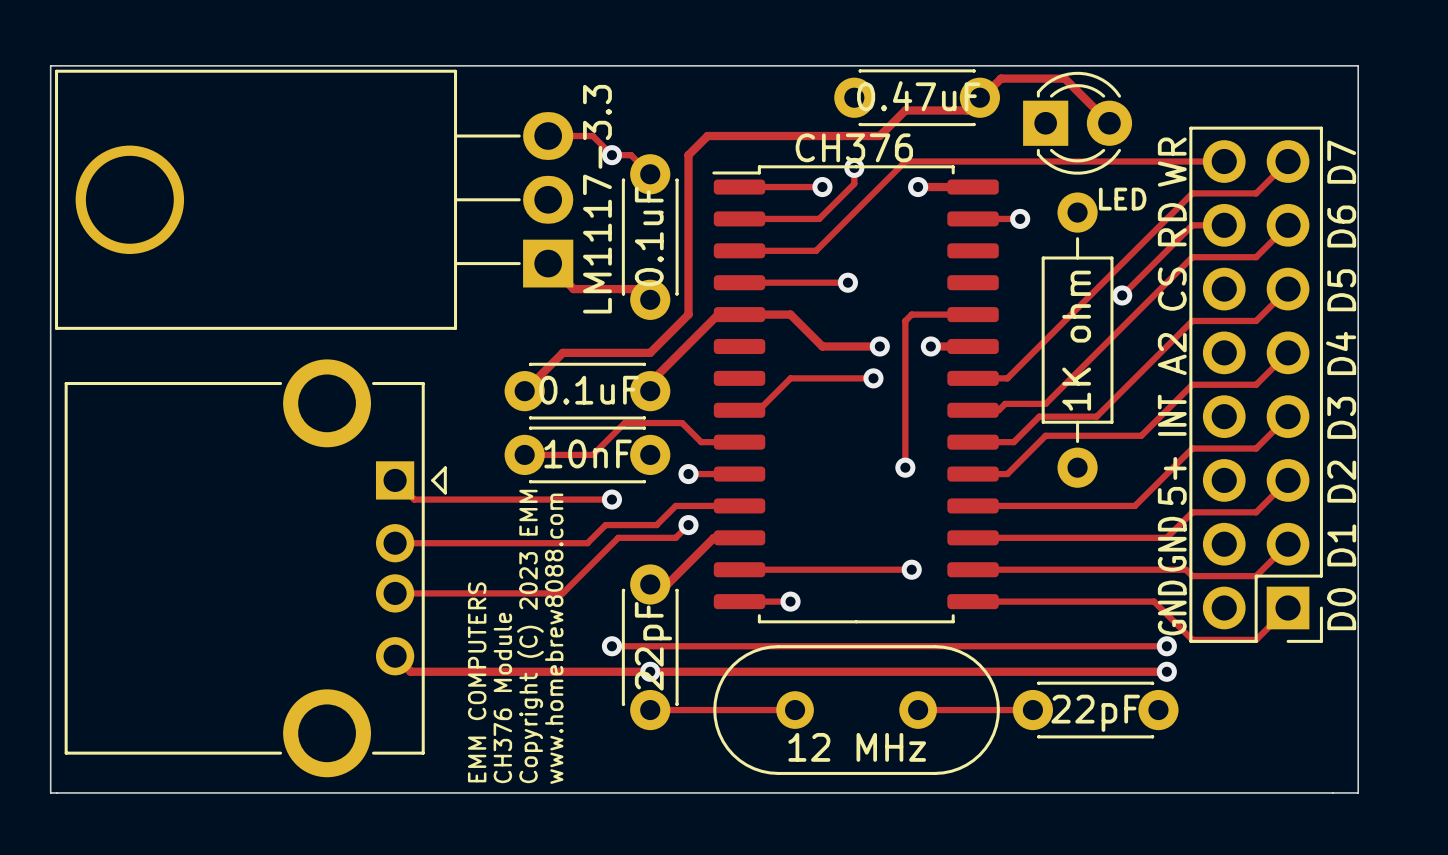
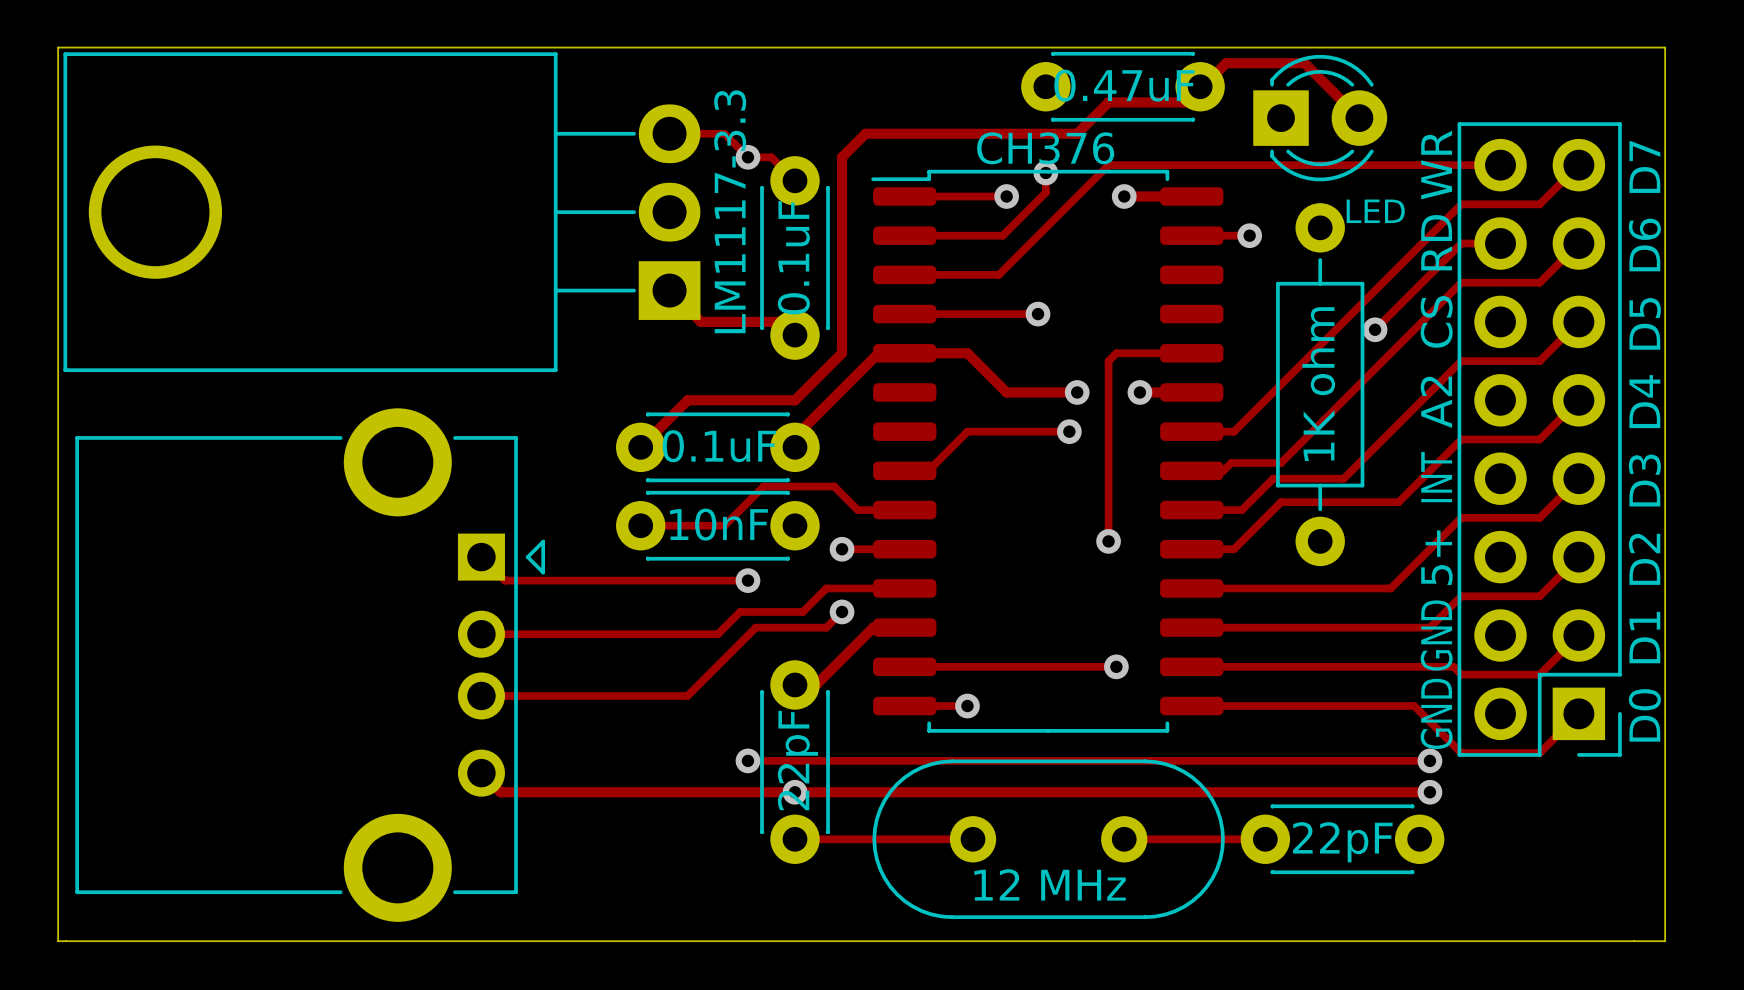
text: Copyright (C) 2023 EMM (530, 636) -> none
text: www.homebrew8088.com (554, 638) -> none
text: EMM COMPUTERS (477, 682) -> none
text: CH376 Module (502, 697) -> none

